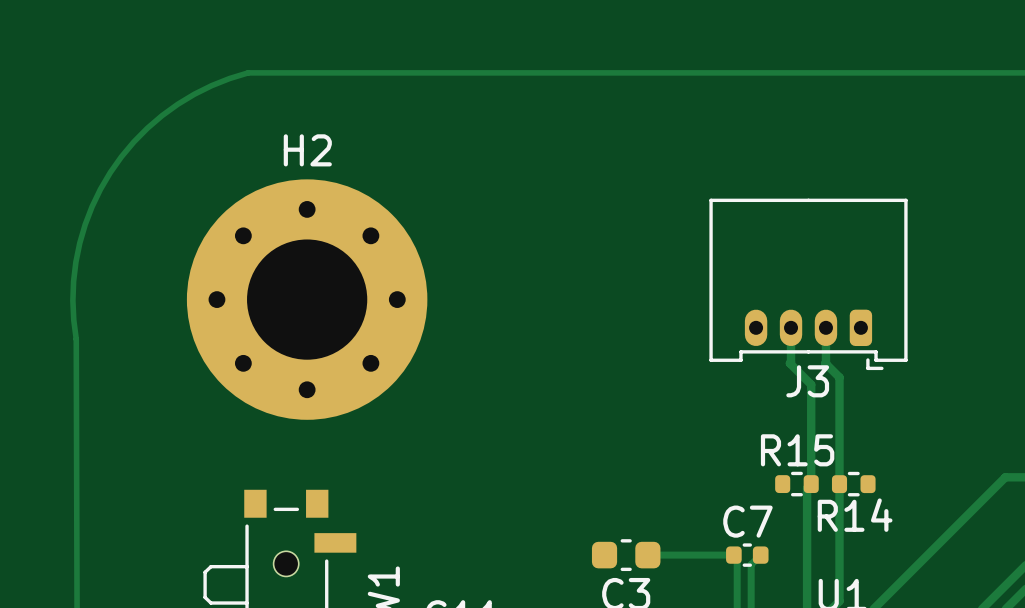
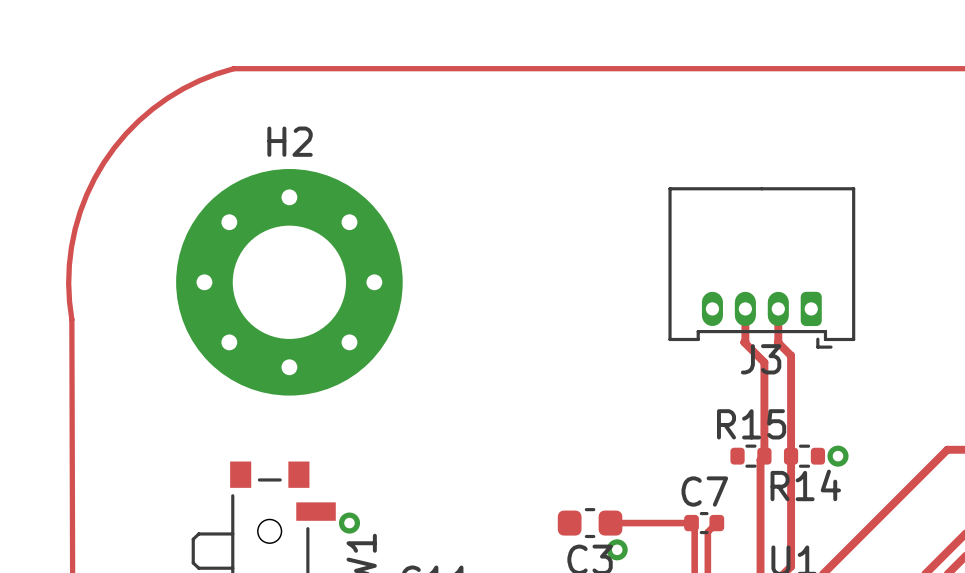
via: none -> (838, 456)
via: none -> (349, 523)
via: none -> (617, 549)

